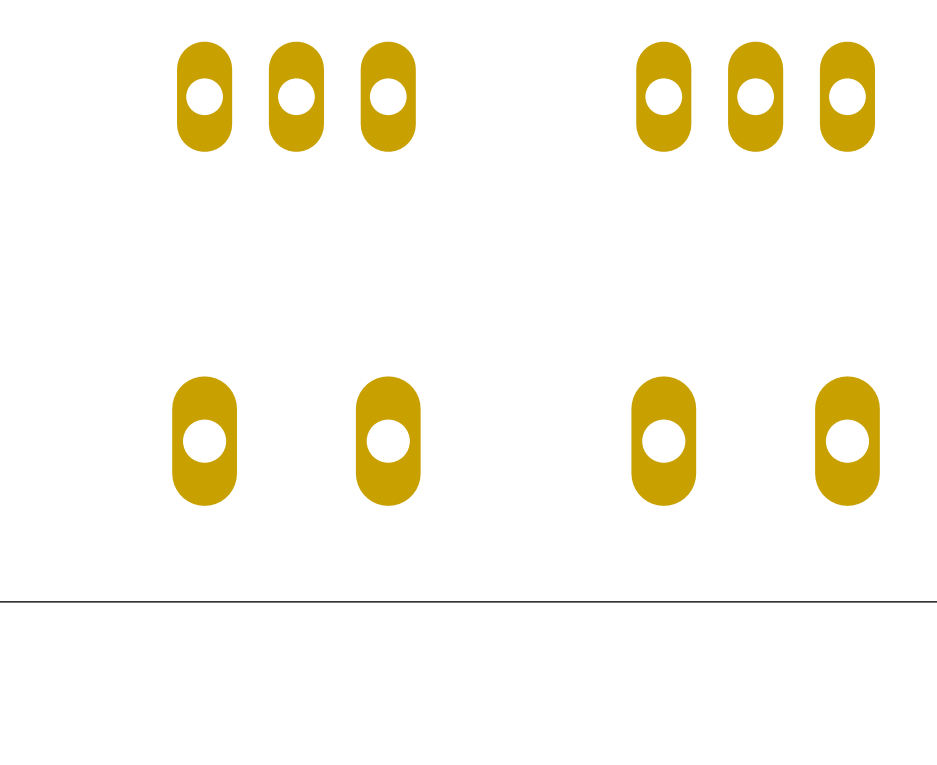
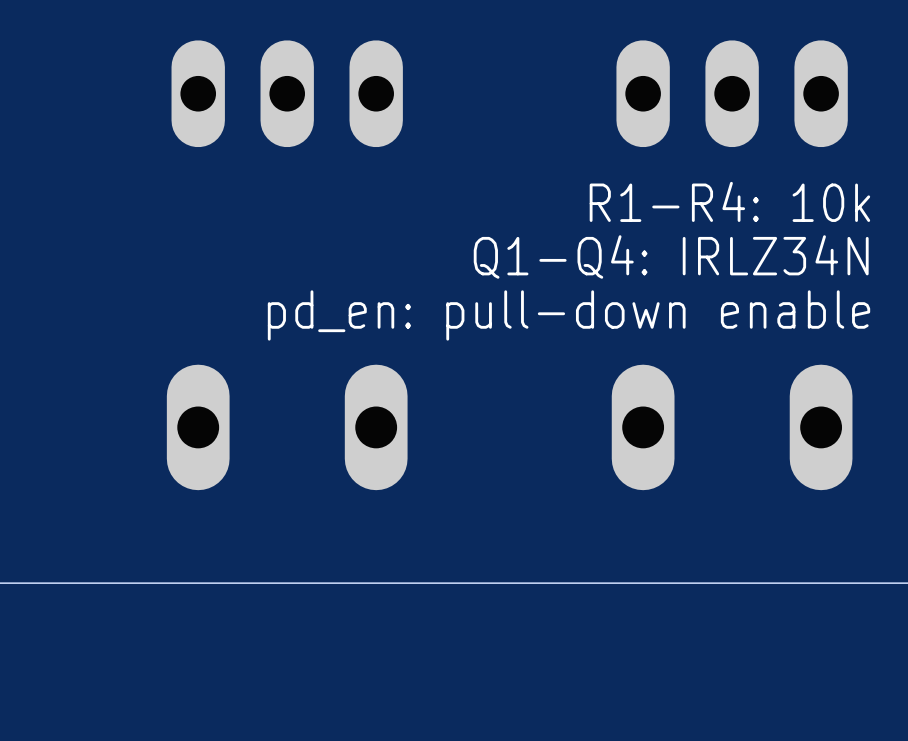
text: none -> R1-R4: 10k (729, 201)
text: none -> Q1-Q4: IRLZ34N (671, 256)
text: none -> pd_en: pull-down enable (569, 315)

